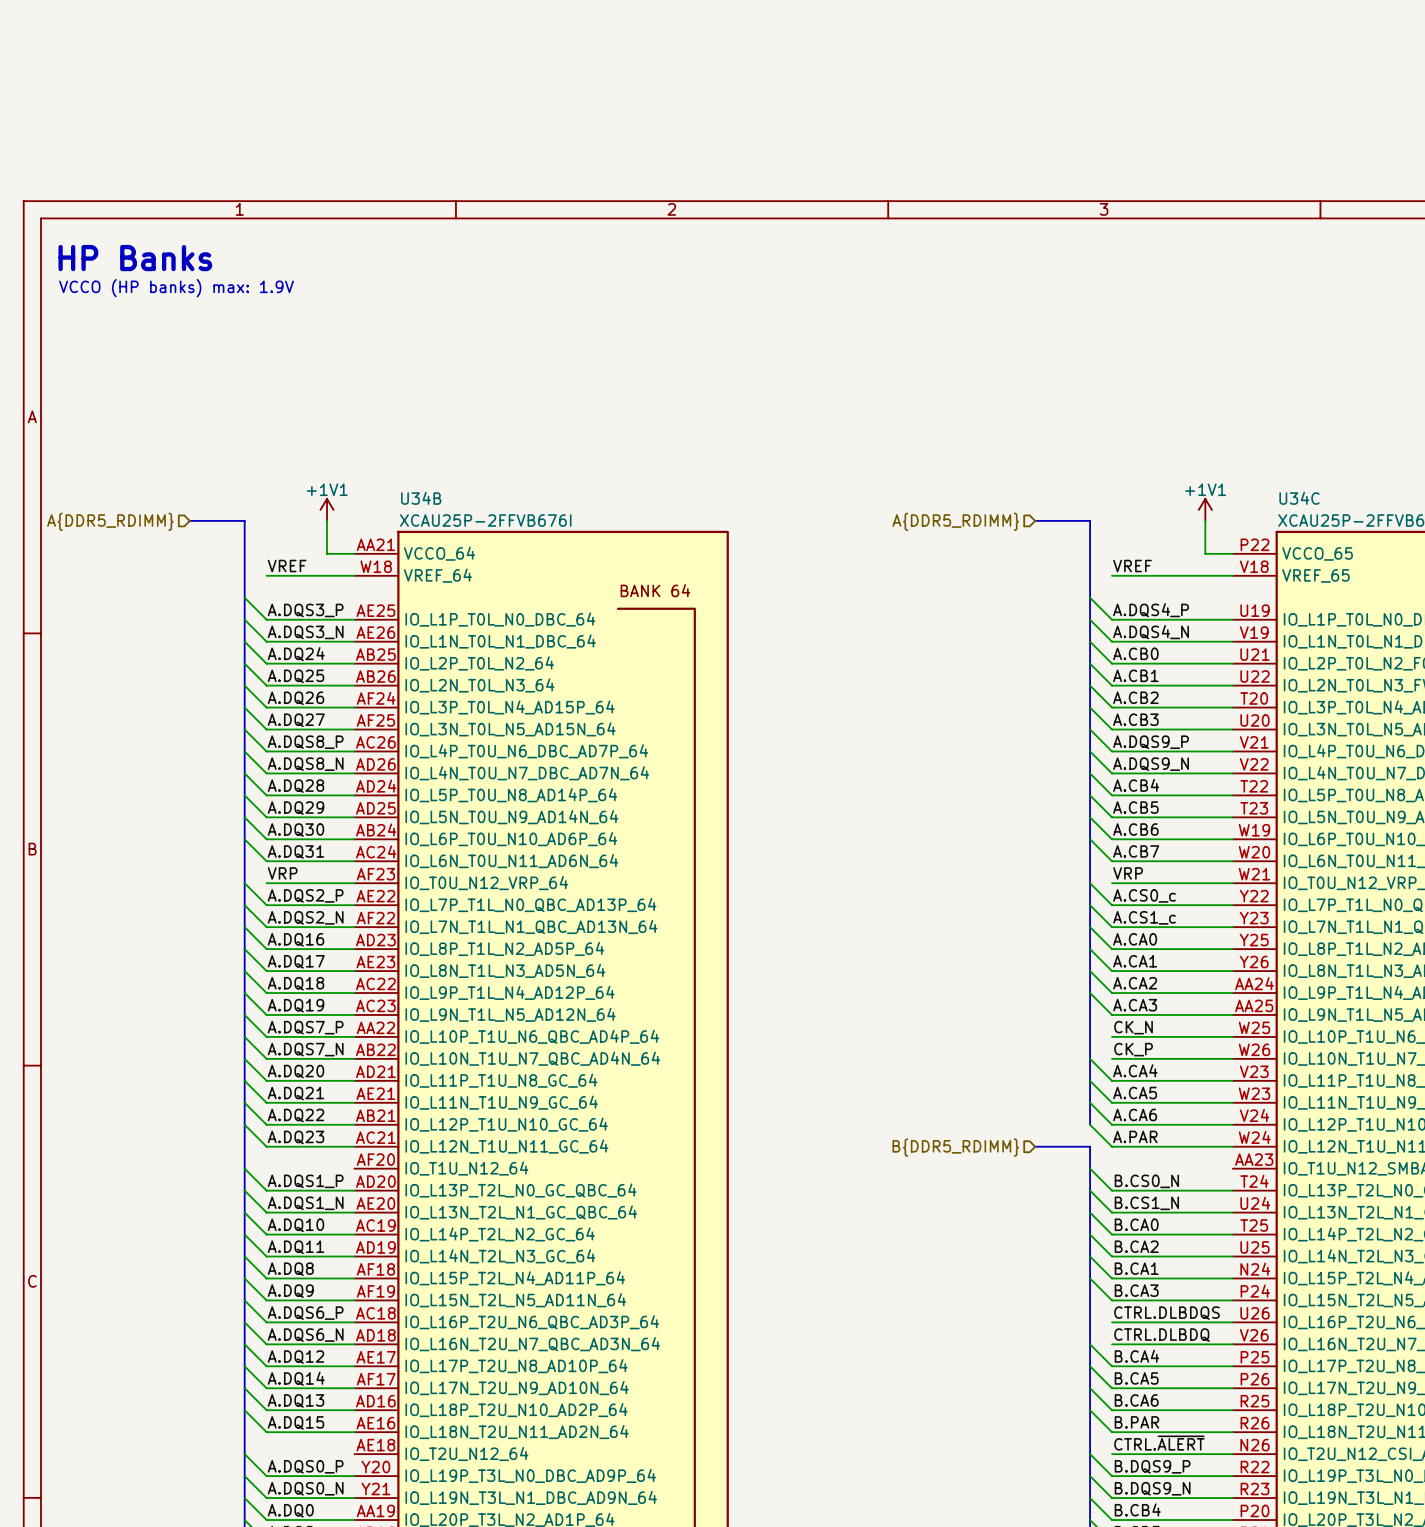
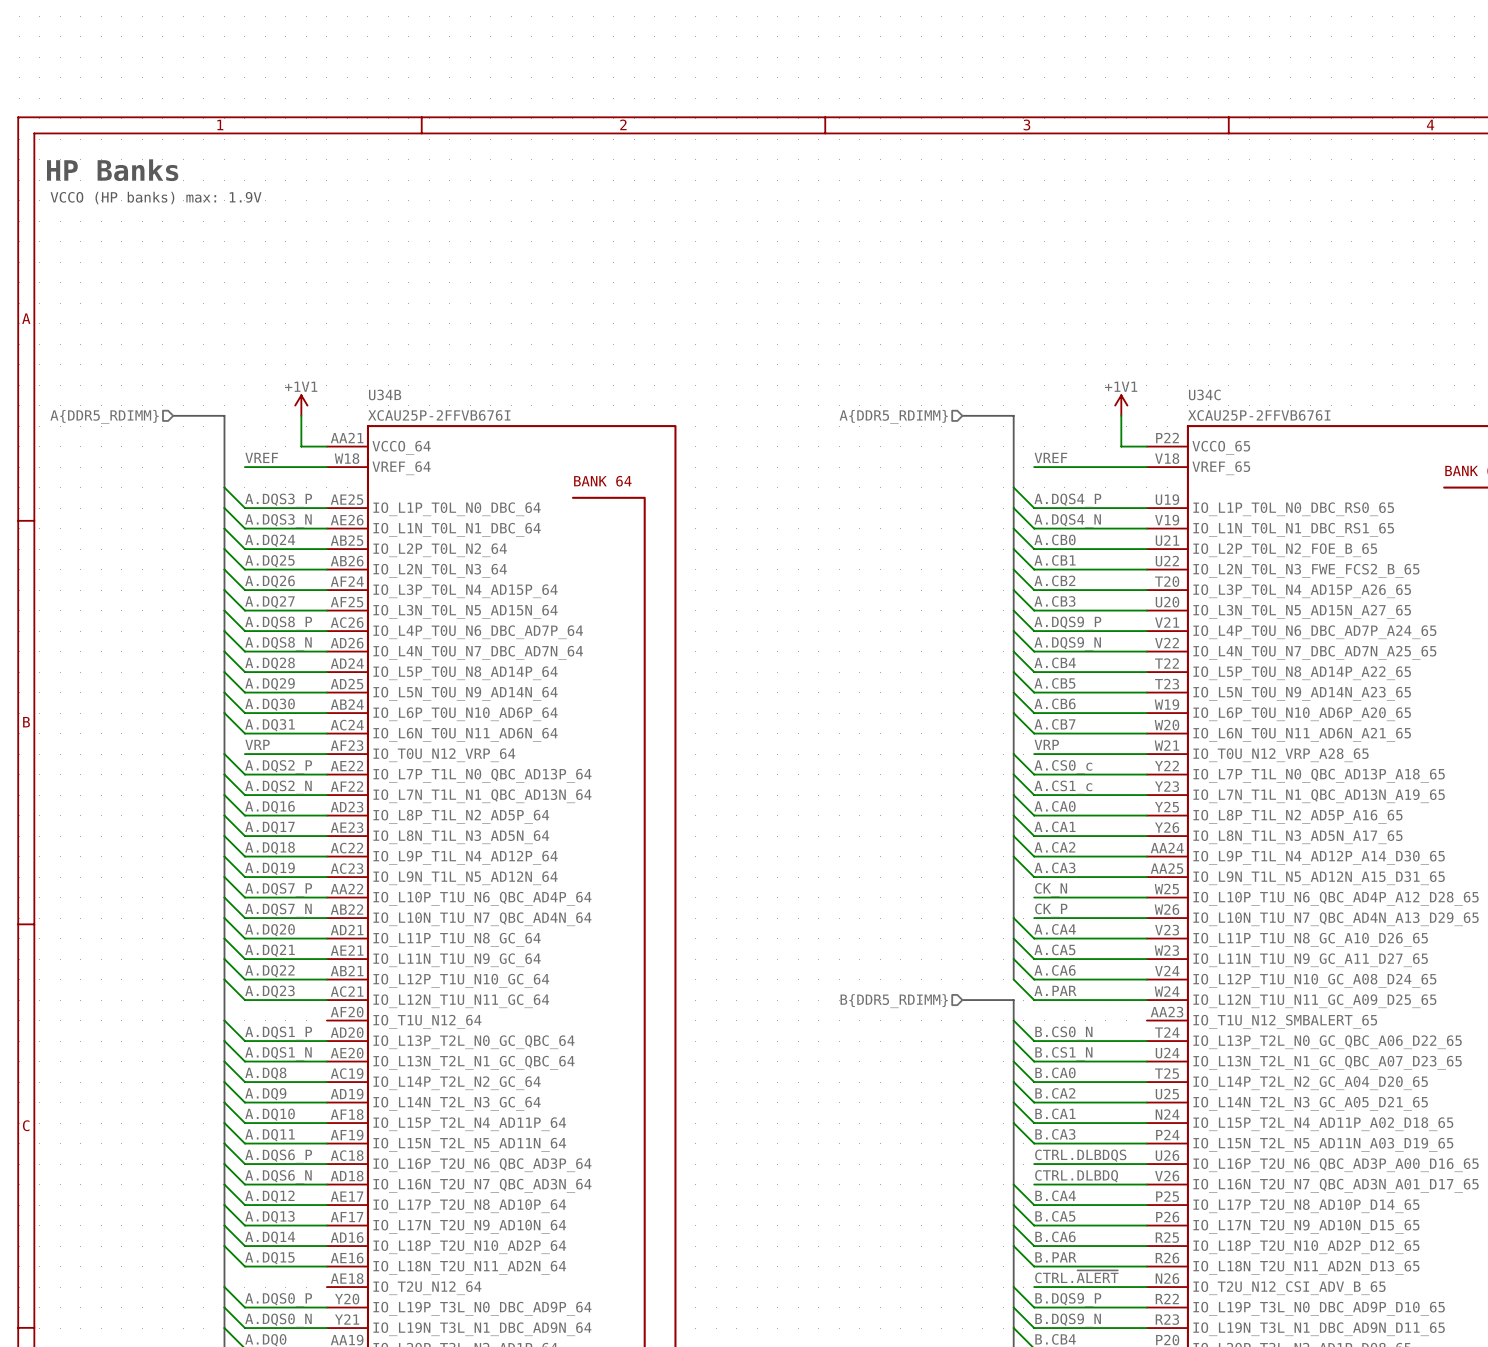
label: A.DQ10 (295, 1225) -> A.DQ8 (265, 1073)
label: A.DQ11 (295, 1247) -> A.DQ9 (265, 1094)
label: A.DQ8 (290, 1269) -> A.DQ10 (270, 1114)
label: A.DQ9 (290, 1291) -> A.DQ11 (270, 1135)
label: A.DQ14 (296, 1378) -> A.DQ13 (269, 1217)
label: A.DQ13 (295, 1400) -> A.DQ14 (270, 1237)

